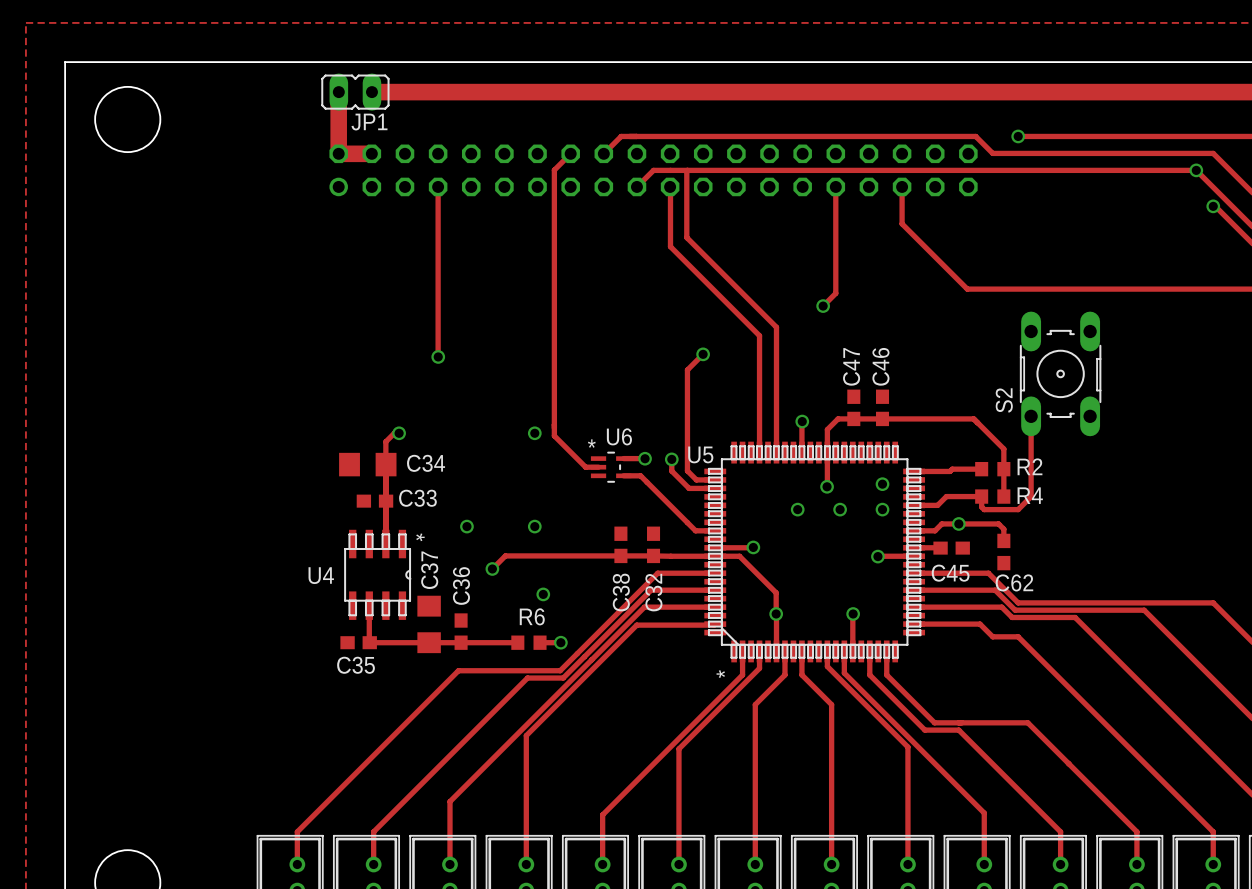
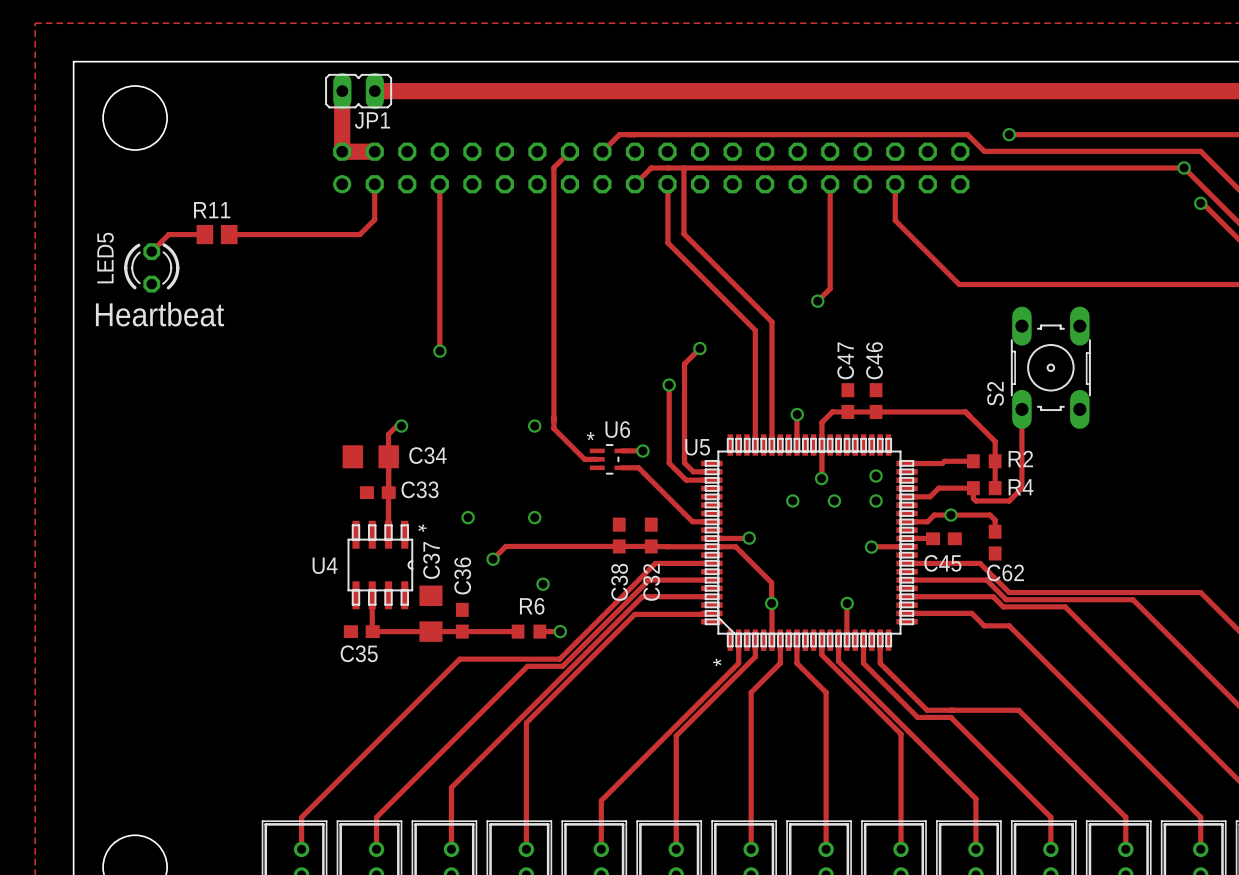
track: none -> (374, 184) (374, 219) (359, 234) (229, 234)
track: none -> (204, 234) (168, 234) (151, 251)
R11: none -> (217, 234)
LED5: none -> (151, 267)
text: none -> Heartbeat (160, 314)
track: none -> (669, 385) (669, 451)
via position: (671, 459) -> (669, 385)

